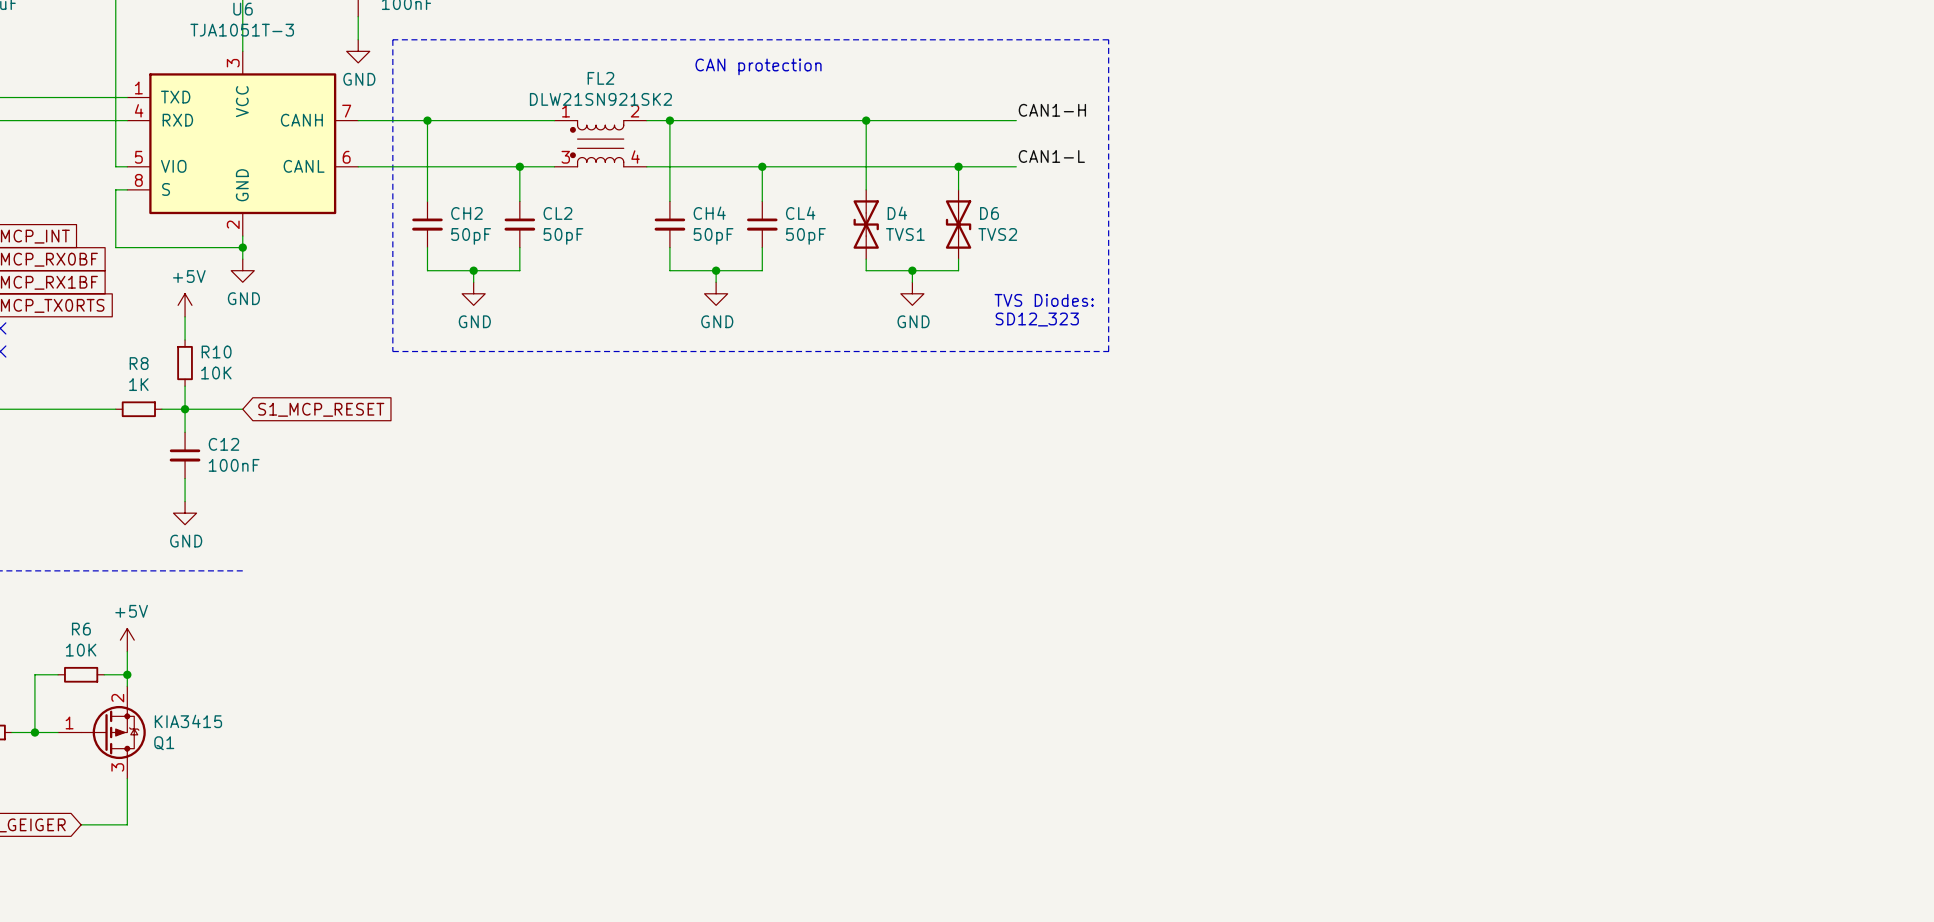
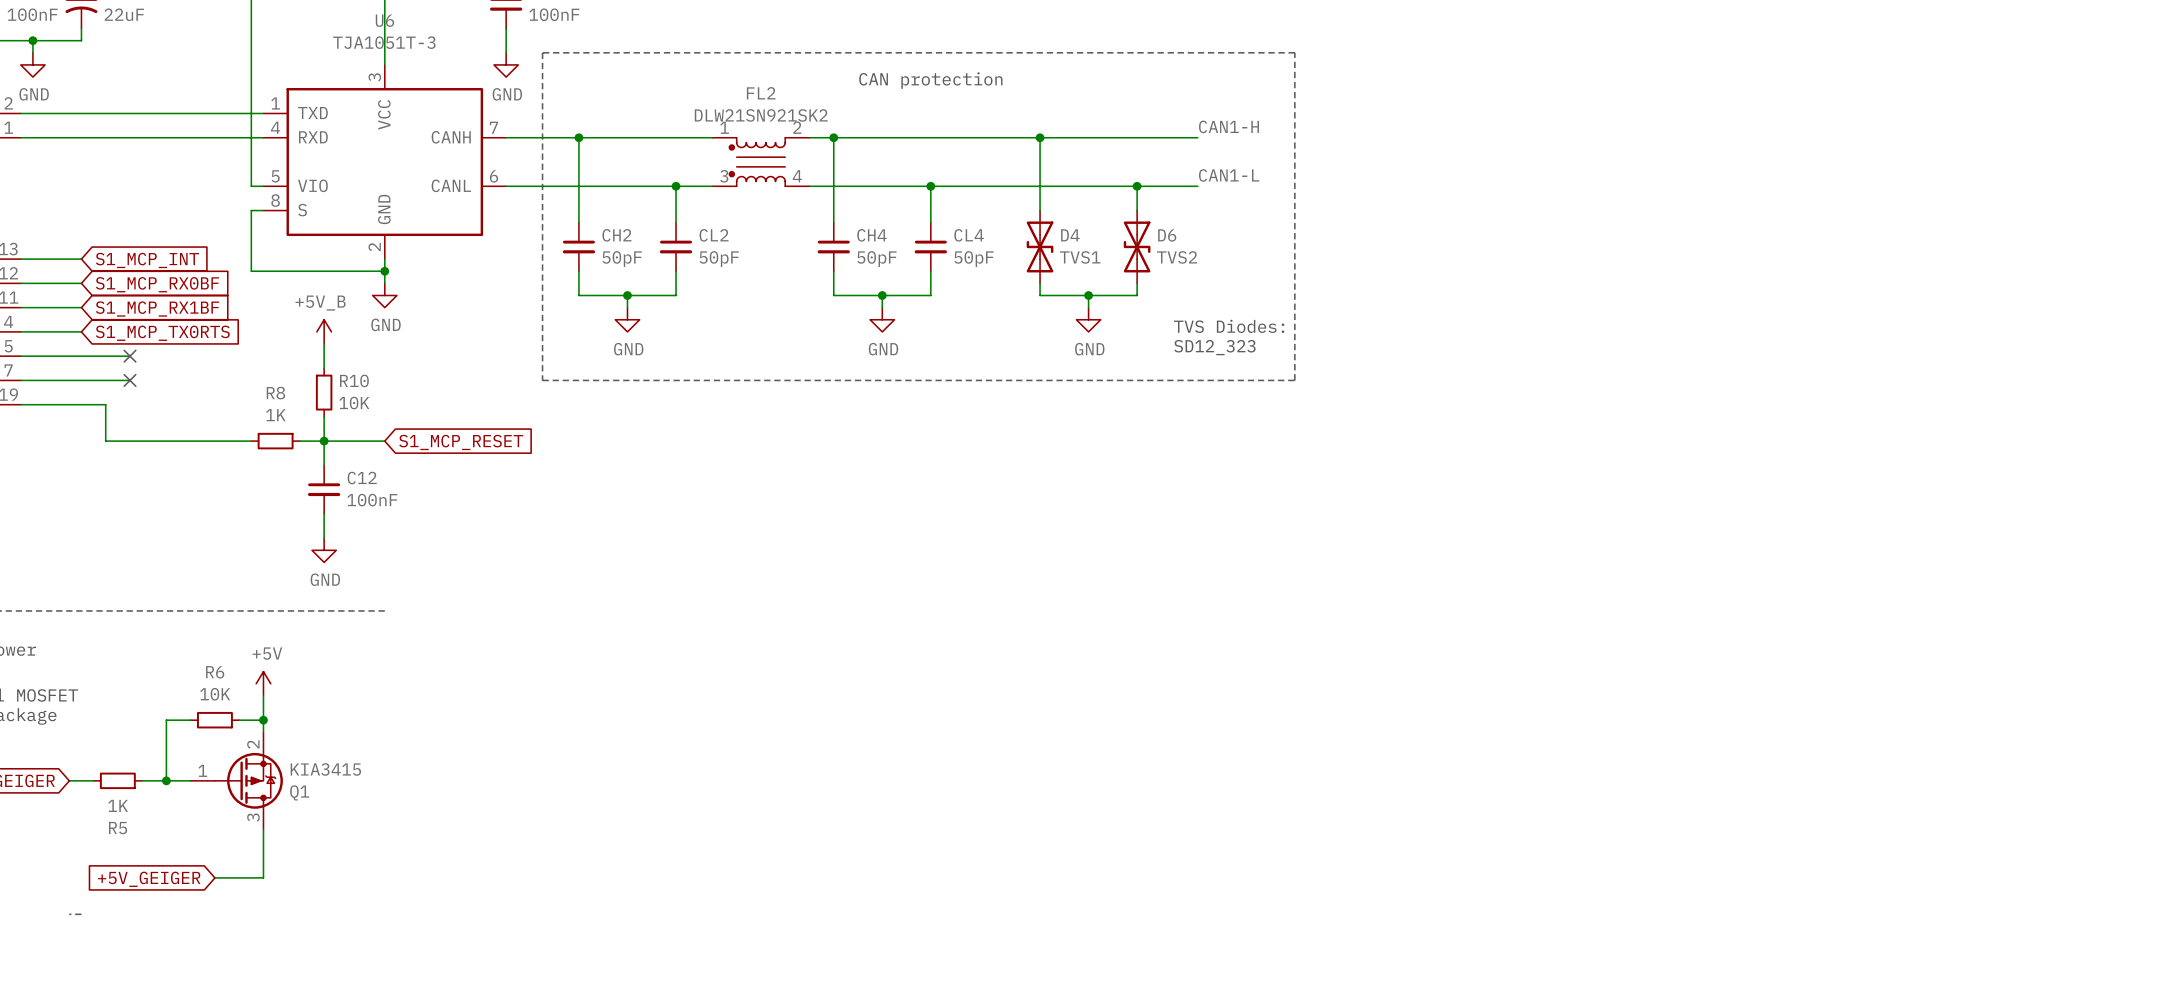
power symbol: +5V (185, 305) -> +5V_B (324, 331)

